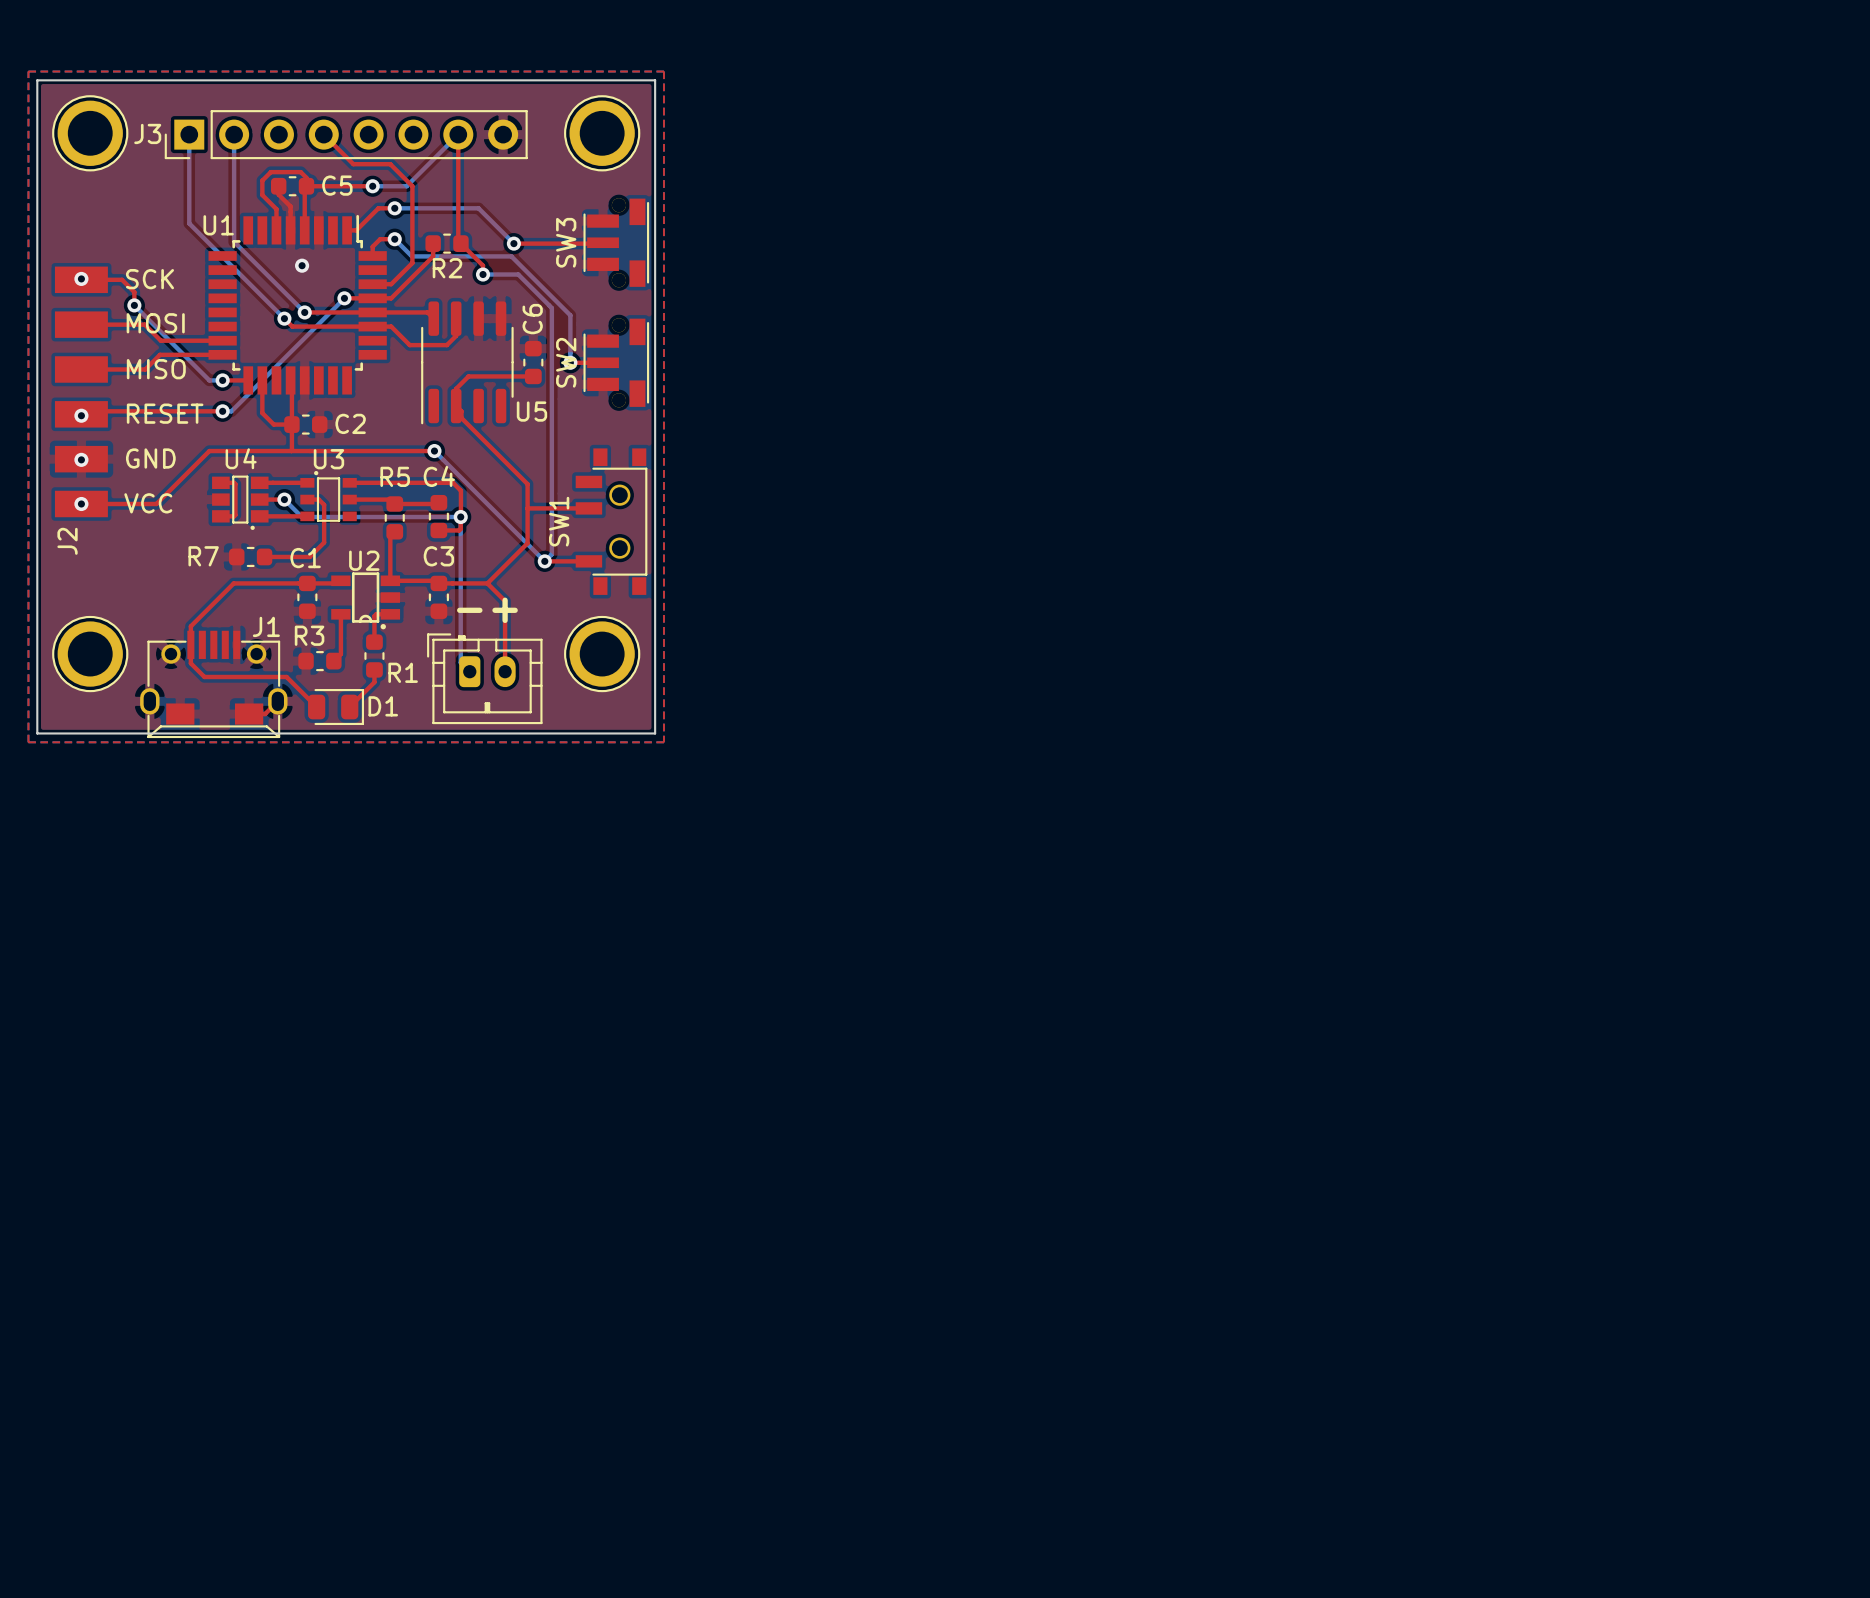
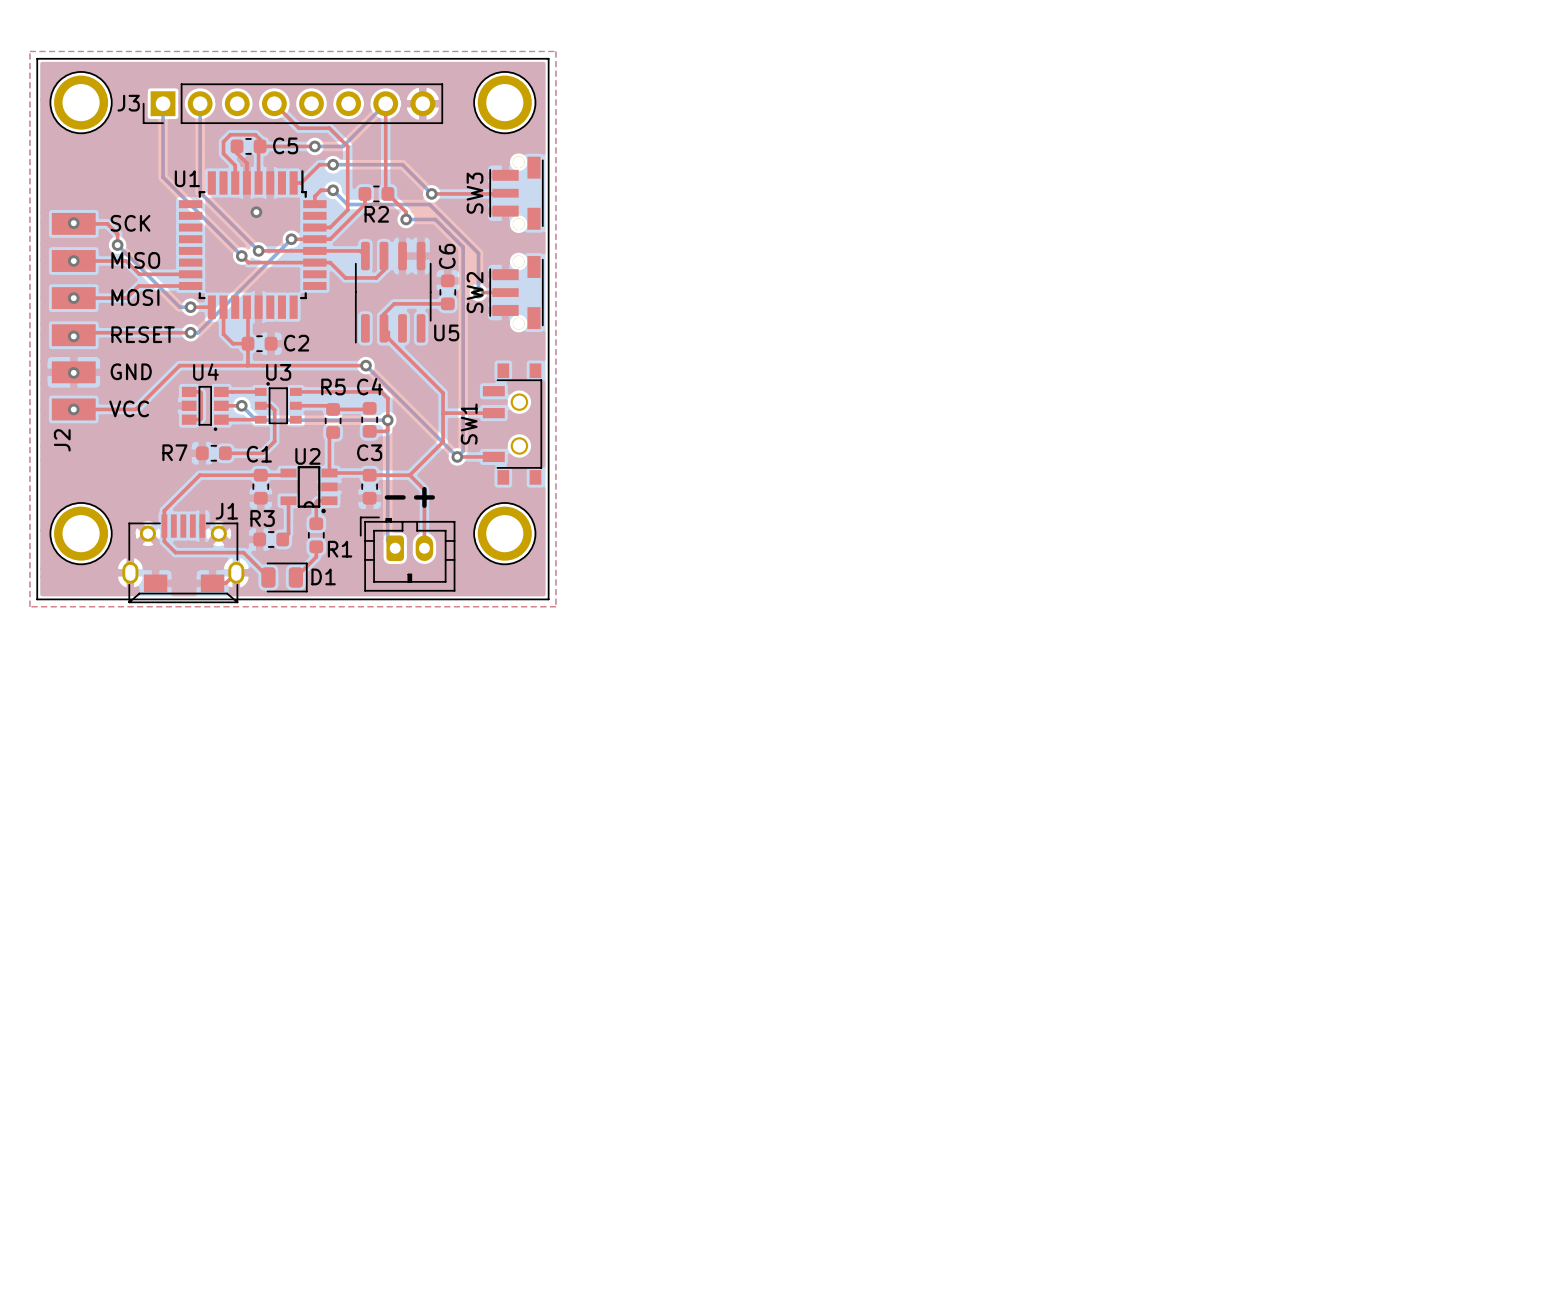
J2 text: MOSI (155, 323) -> none
J2 text: none -> MISO (135, 260)
via: none -> (73, 261)
via: none -> (73, 298)
J2 text: MISO (156, 369) -> MOSI (135, 297)

